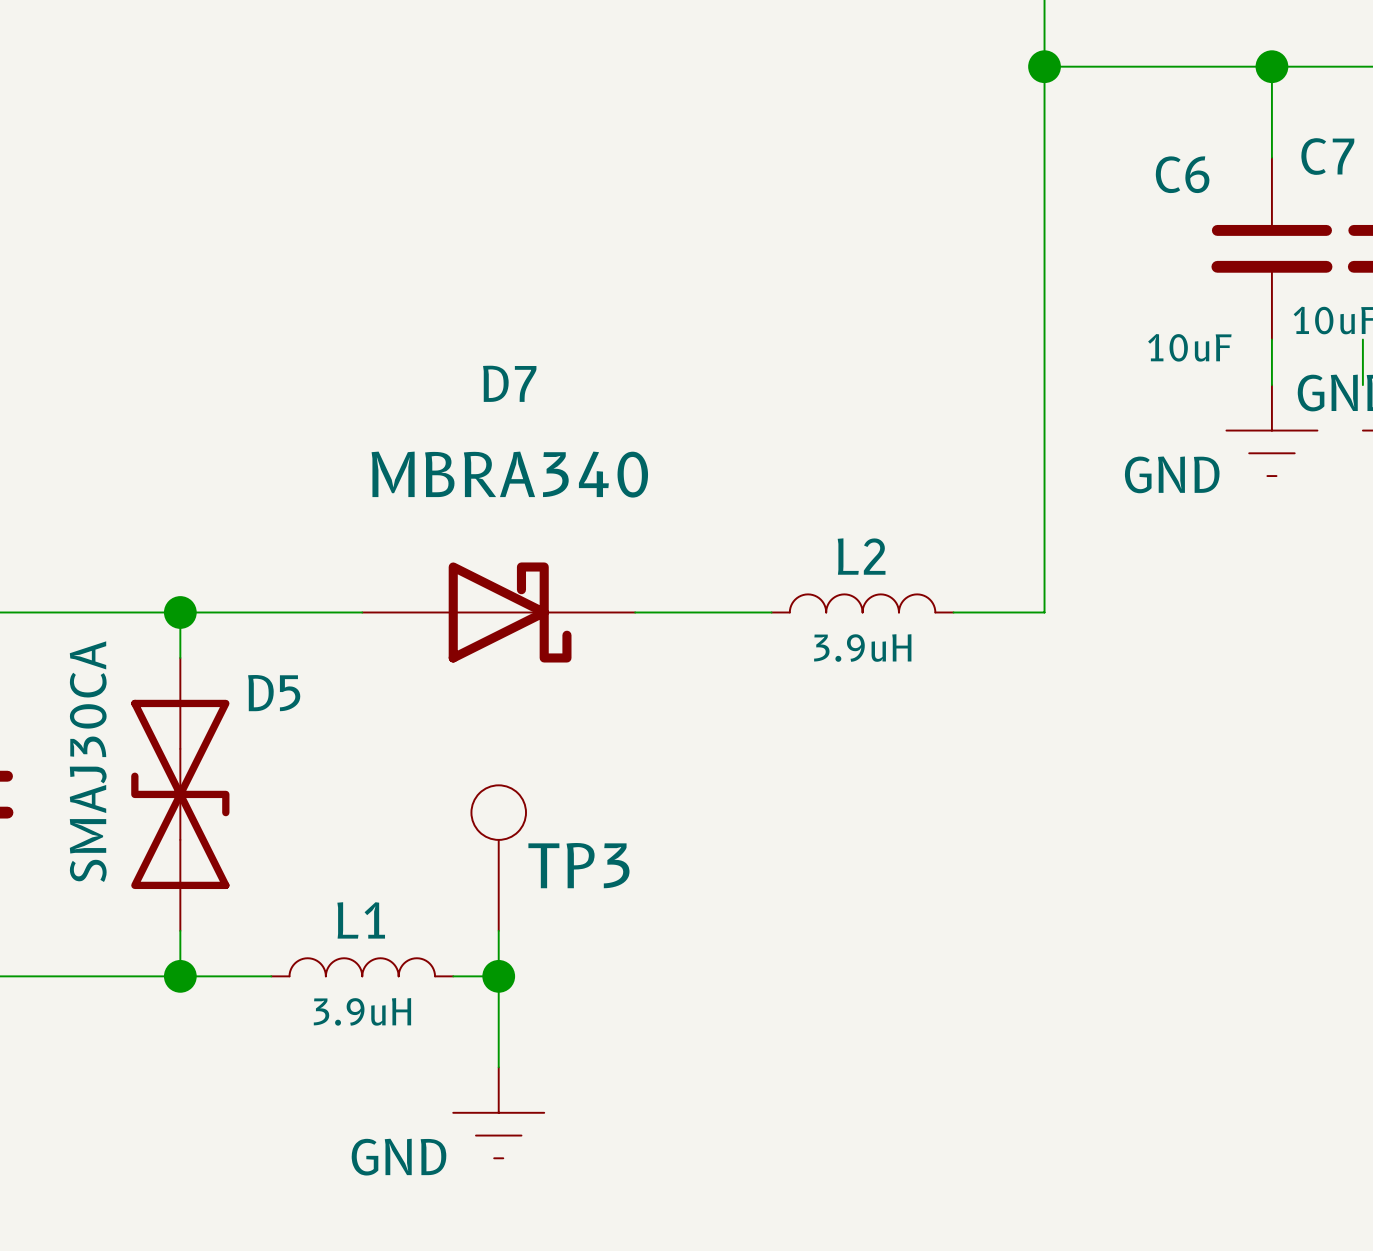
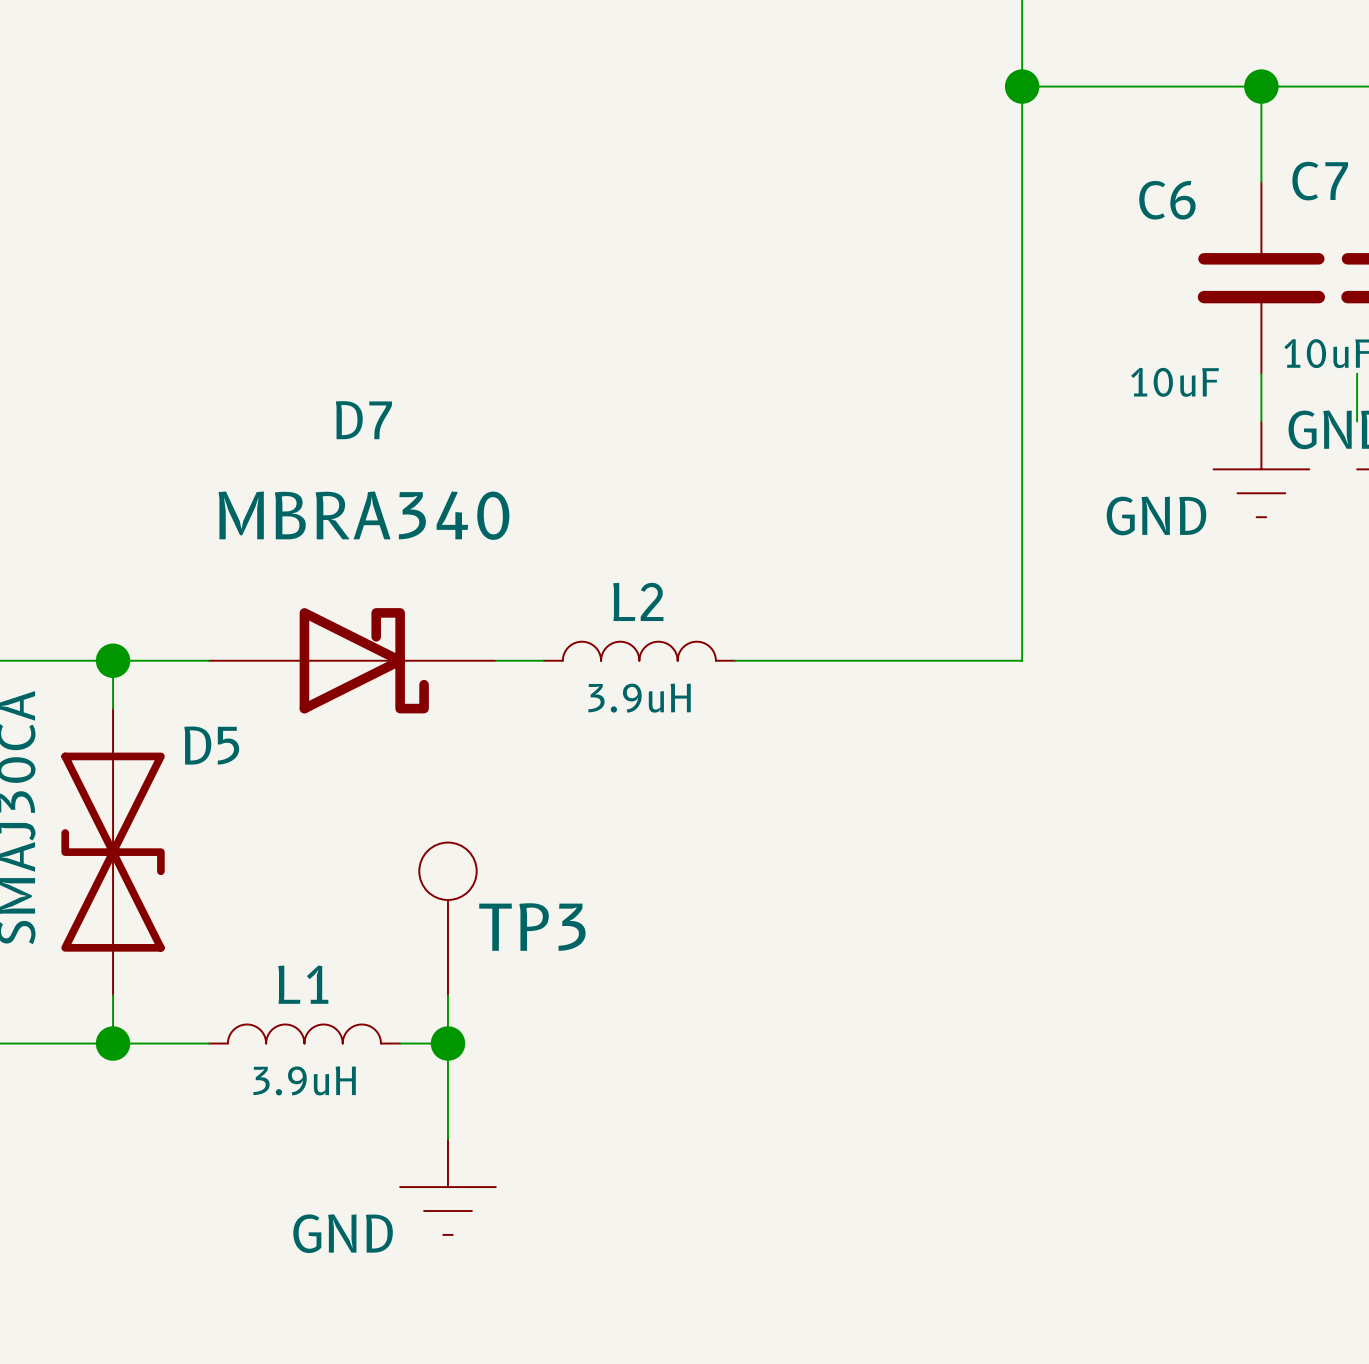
L2 position: (862, 603) -> (639, 651)
D7 position: (498, 612) -> (352, 660)
wire: (635, 612) (771, 612) -> (926, 660) (735, 660)

